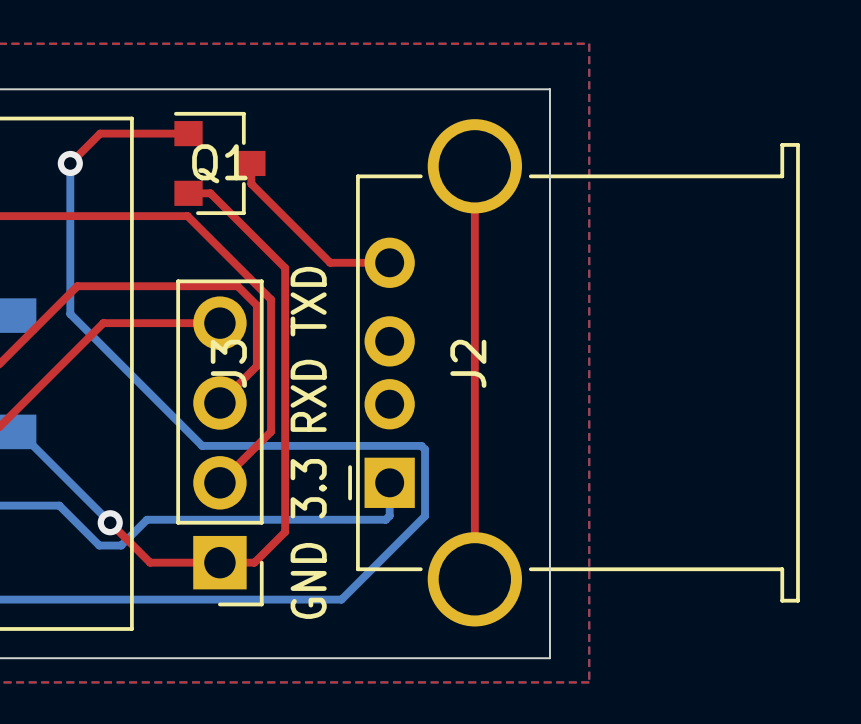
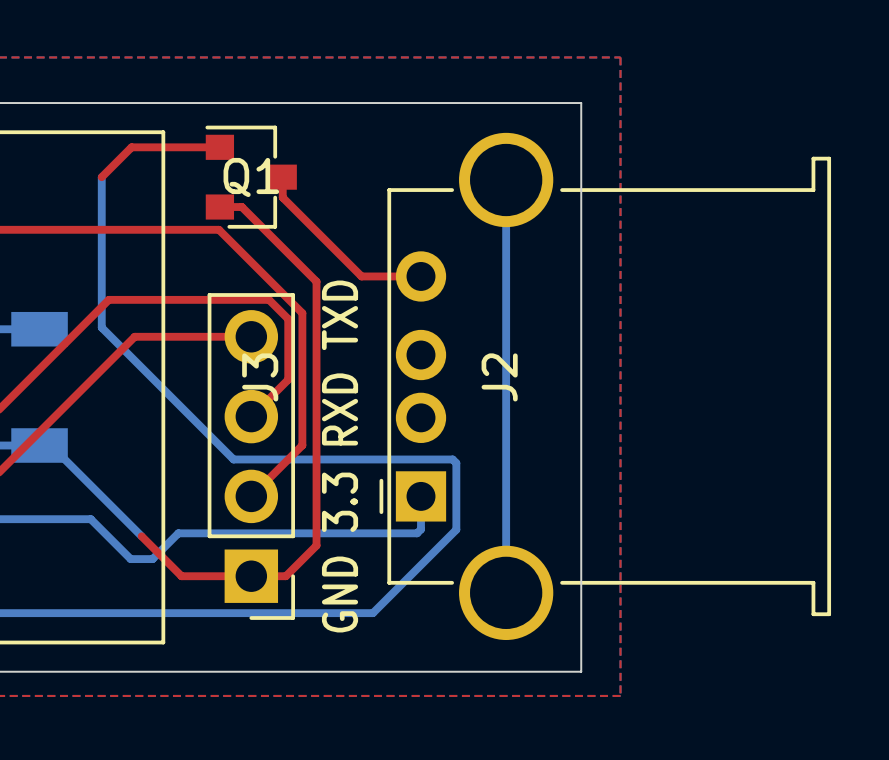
via: (70, 163) -> none
top track: (474, 166) (474, 579) -> none
bottom track: none -> (506, 180) (506, 592)
via: (110, 522) -> none

